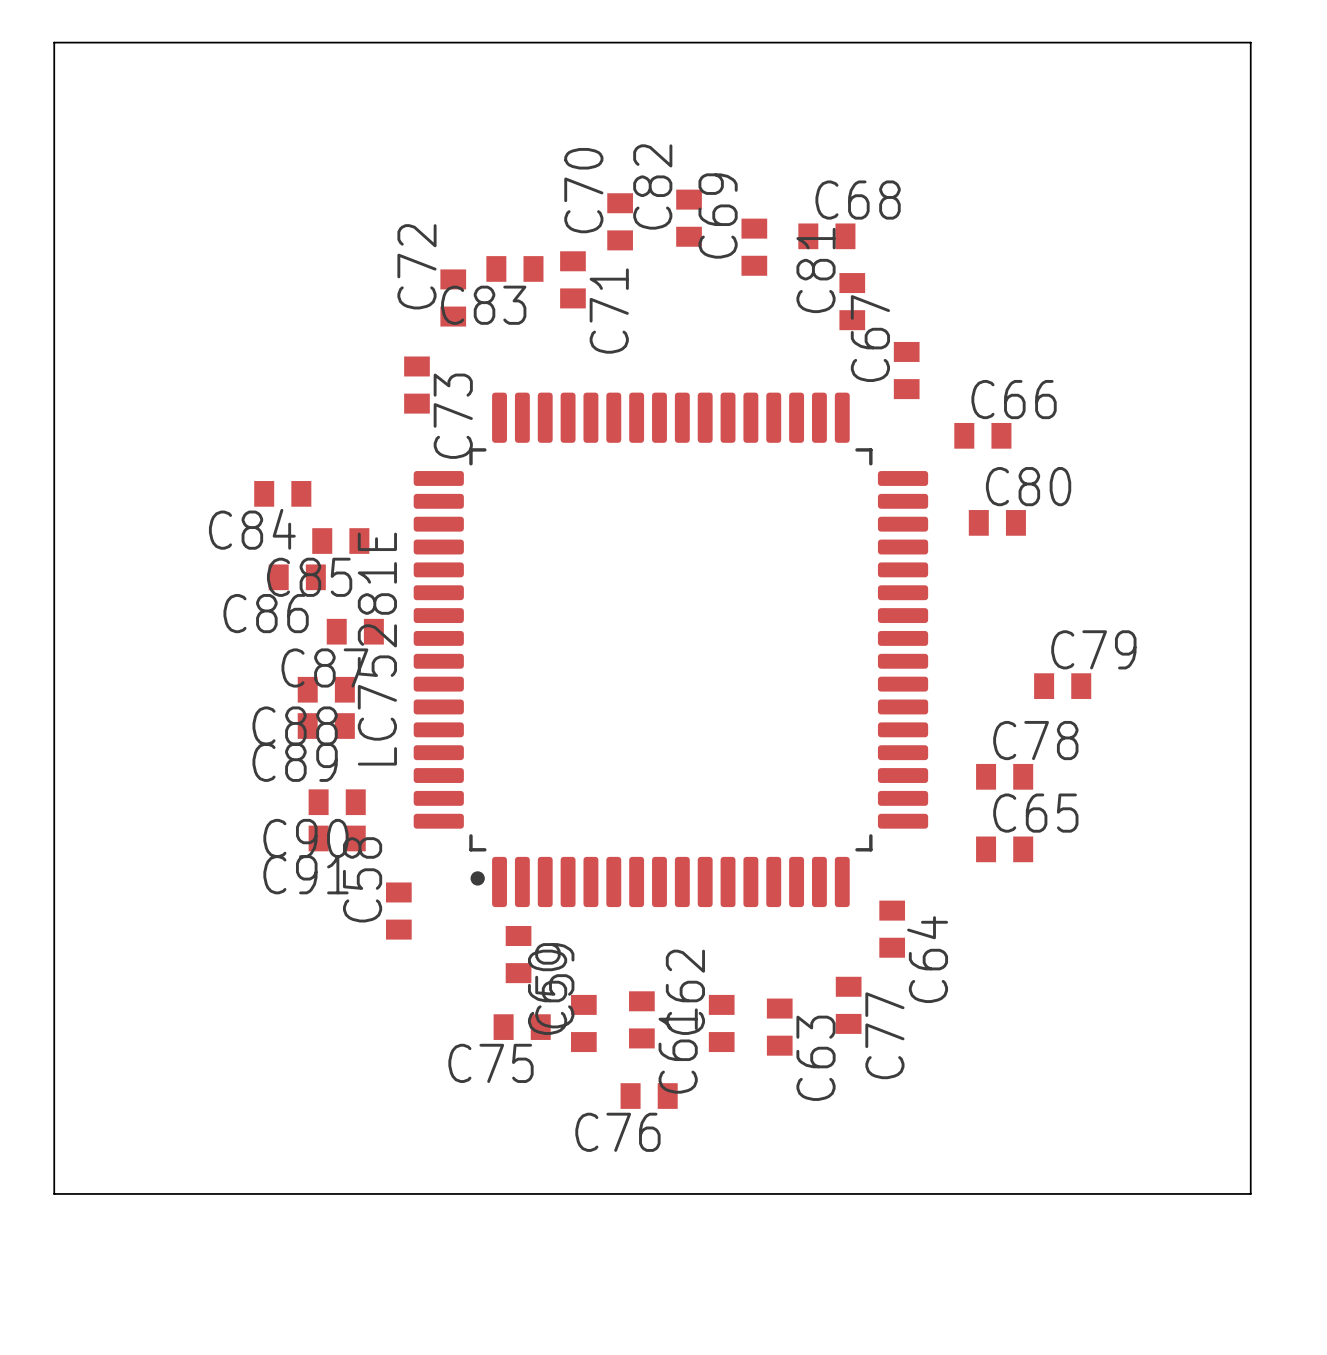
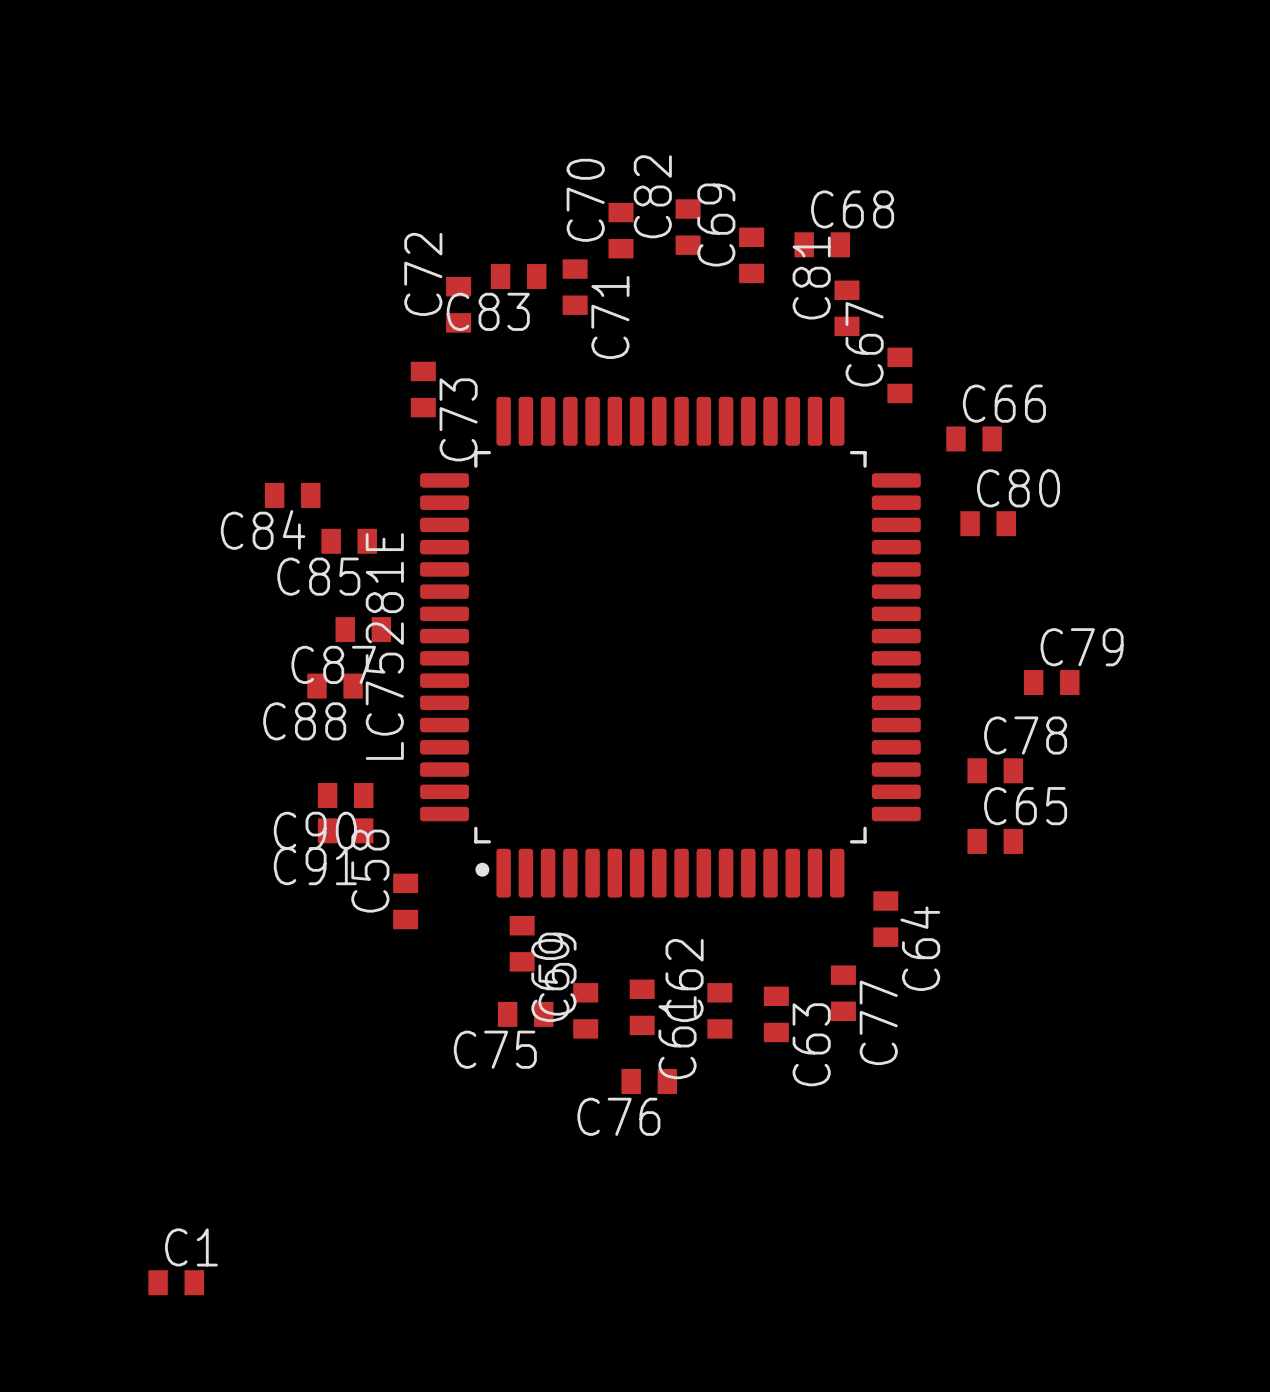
board edge: (54, 42) (1250, 42) (1250, 1193) (54, 1193) (54, 42) -> none
C86: (297, 577) -> none
C89: (326, 726) -> none
C1: none -> (176, 1282)

